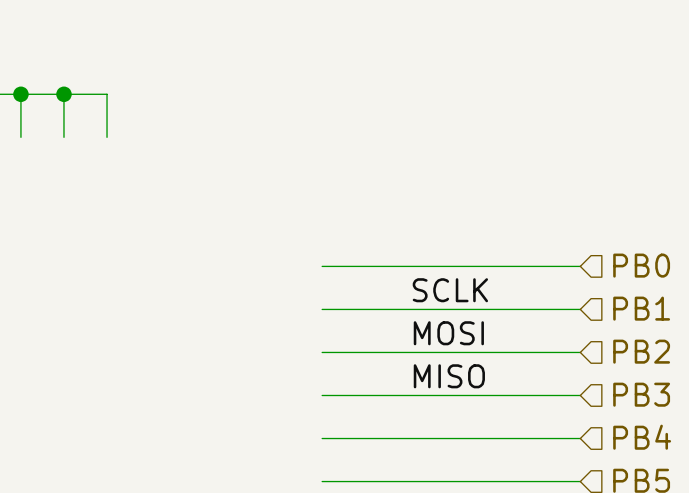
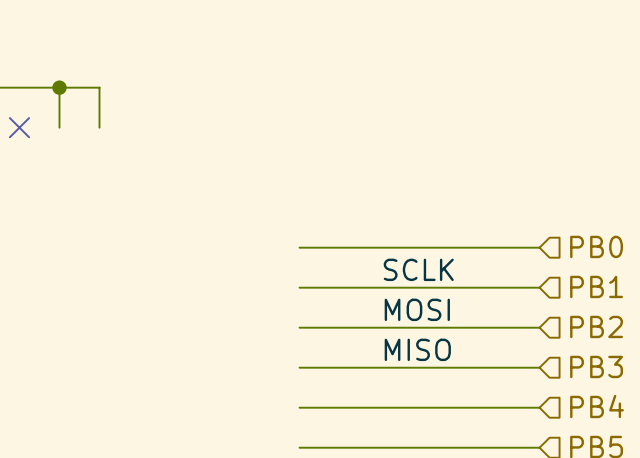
wire: (20, 94) (20, 137) -> none
junction: (20, 94) -> none
no-connect mark: none -> (19, 127)

